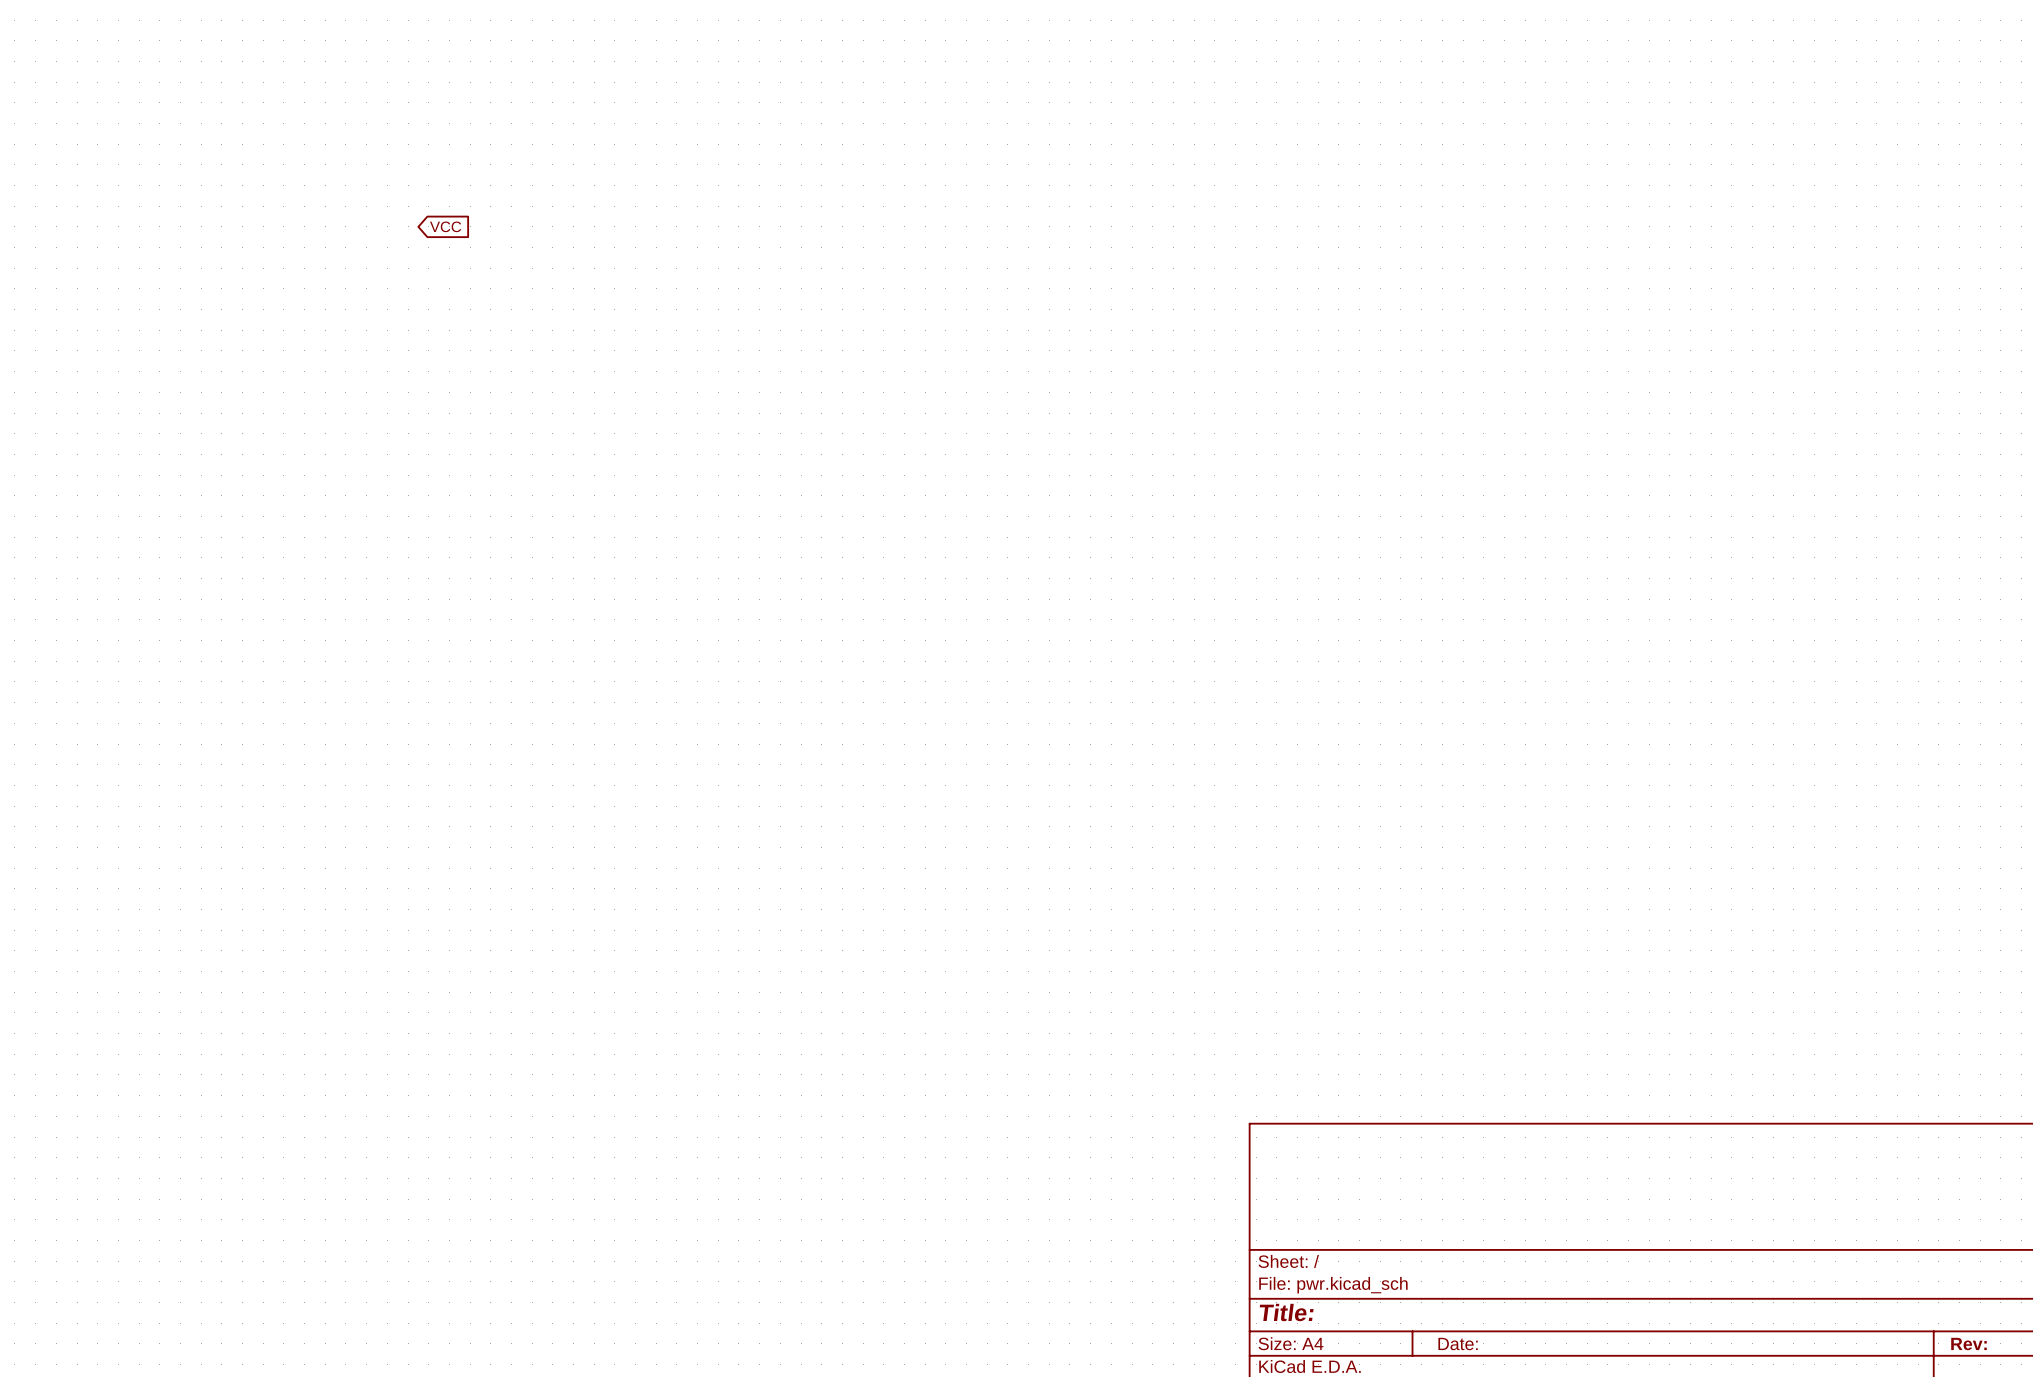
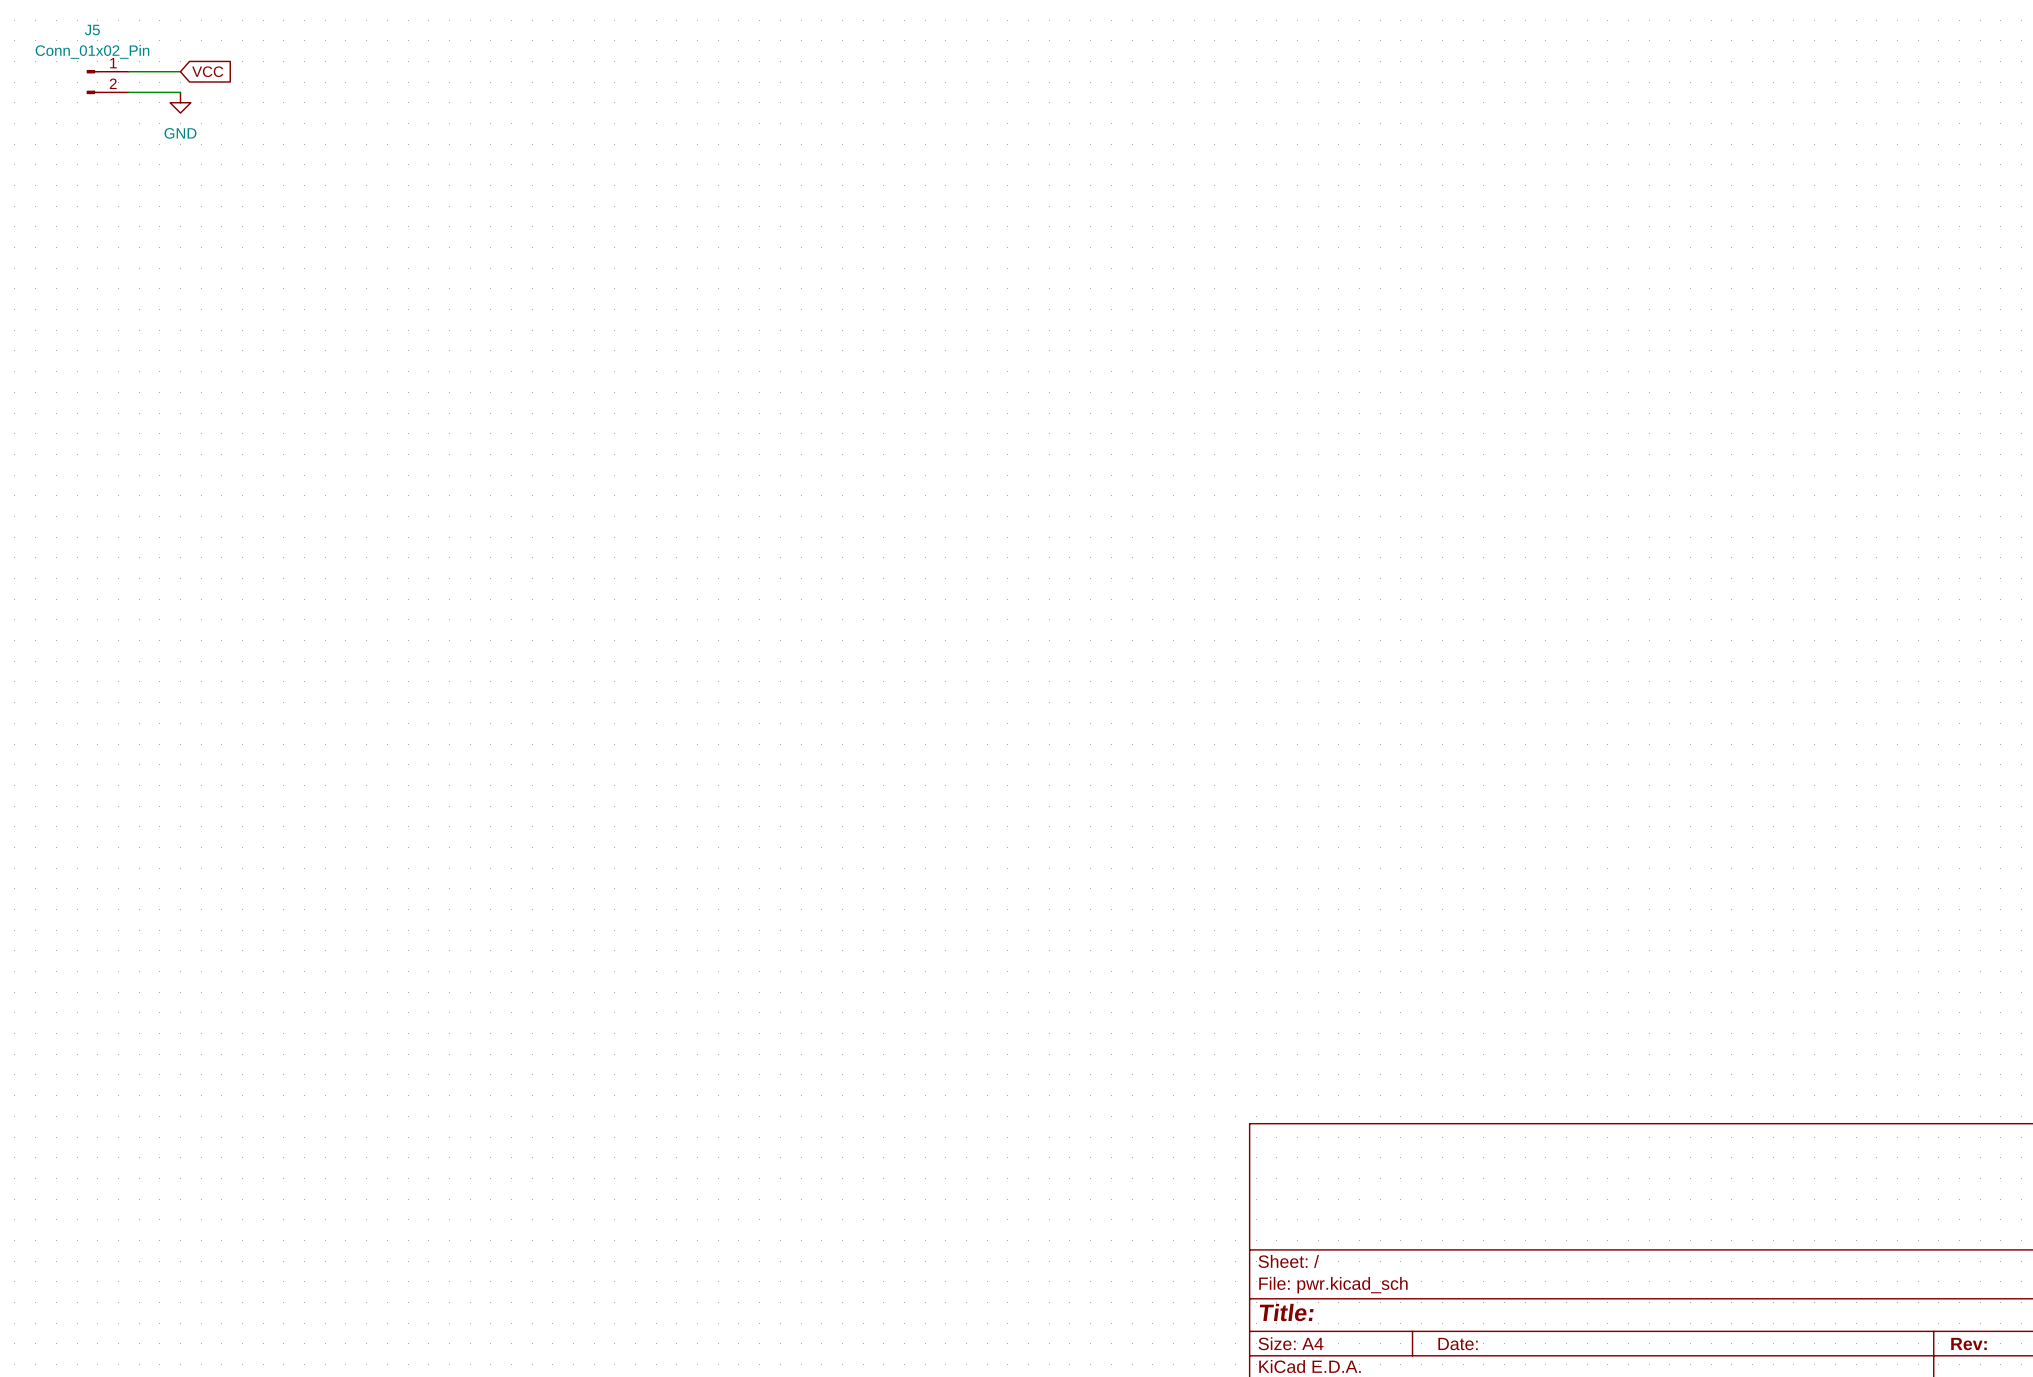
wire: none -> (128, 71) (180, 71)
global label: none -> VCC (207, 71)
J5: none -> Conn_01x02_Pin (107, 82)
wire: none -> (128, 92) (180, 92)
power symbol: none -> GND (180, 102)
global label: VCC (445, 226) -> none

